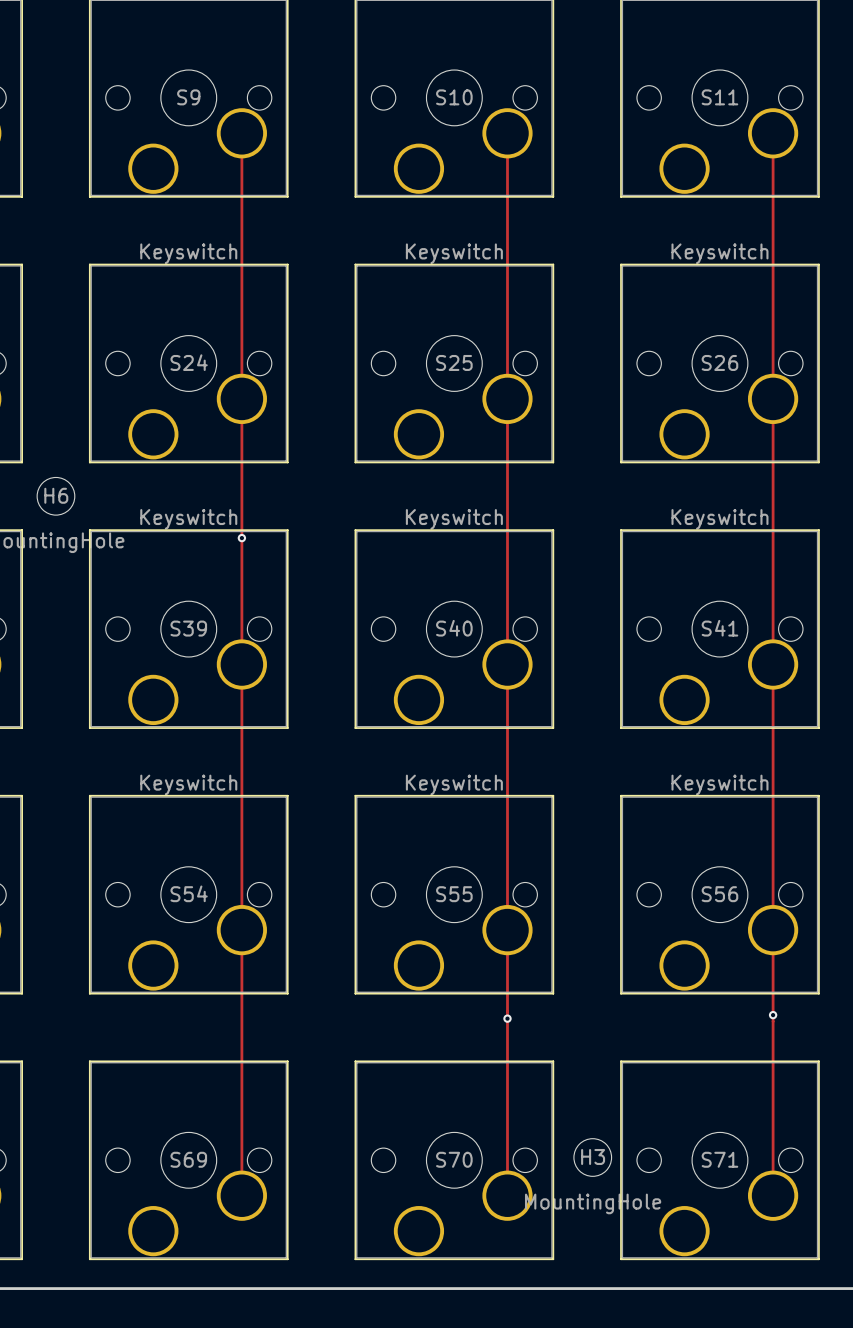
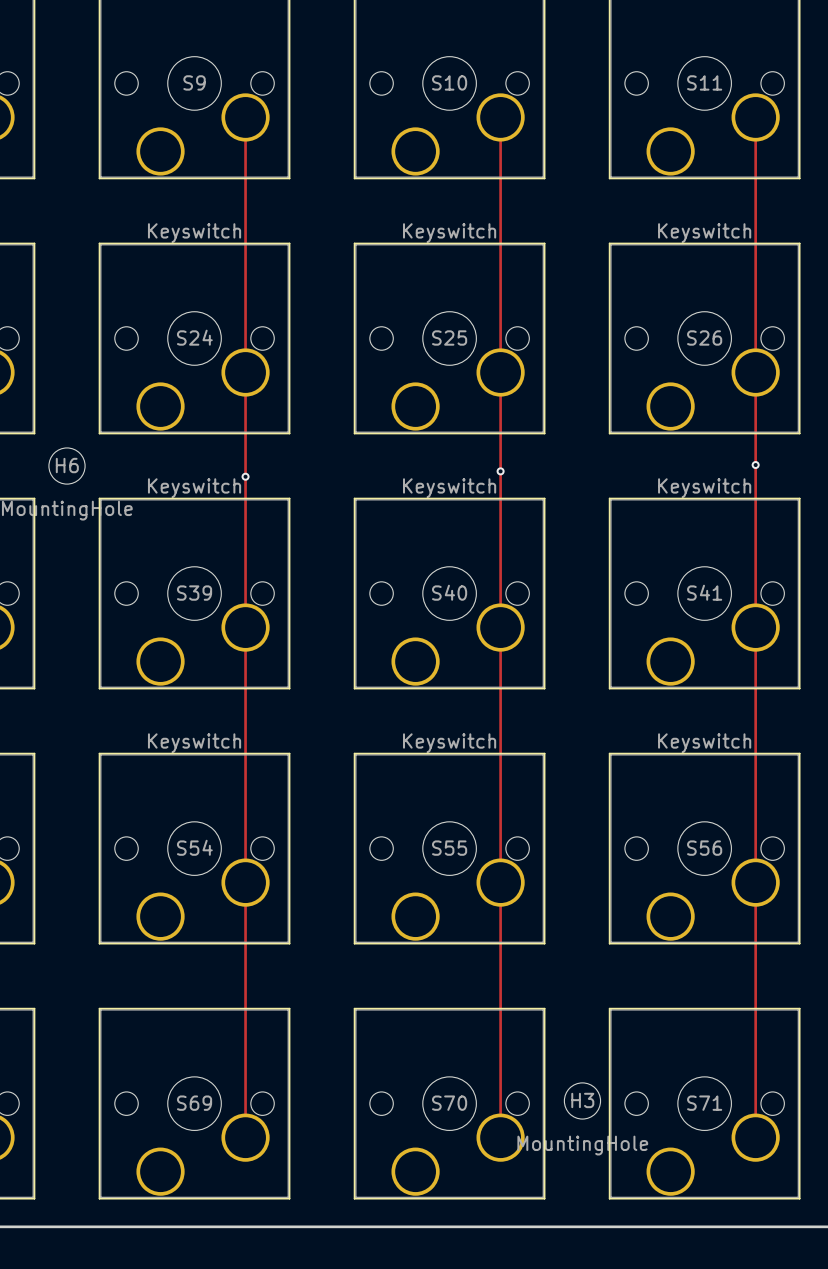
via: none -> (755, 465)
via: none -> (500, 471)
via position: (241, 538) -> (245, 476)
via: (773, 1015) -> none
via: (507, 1018) -> none

